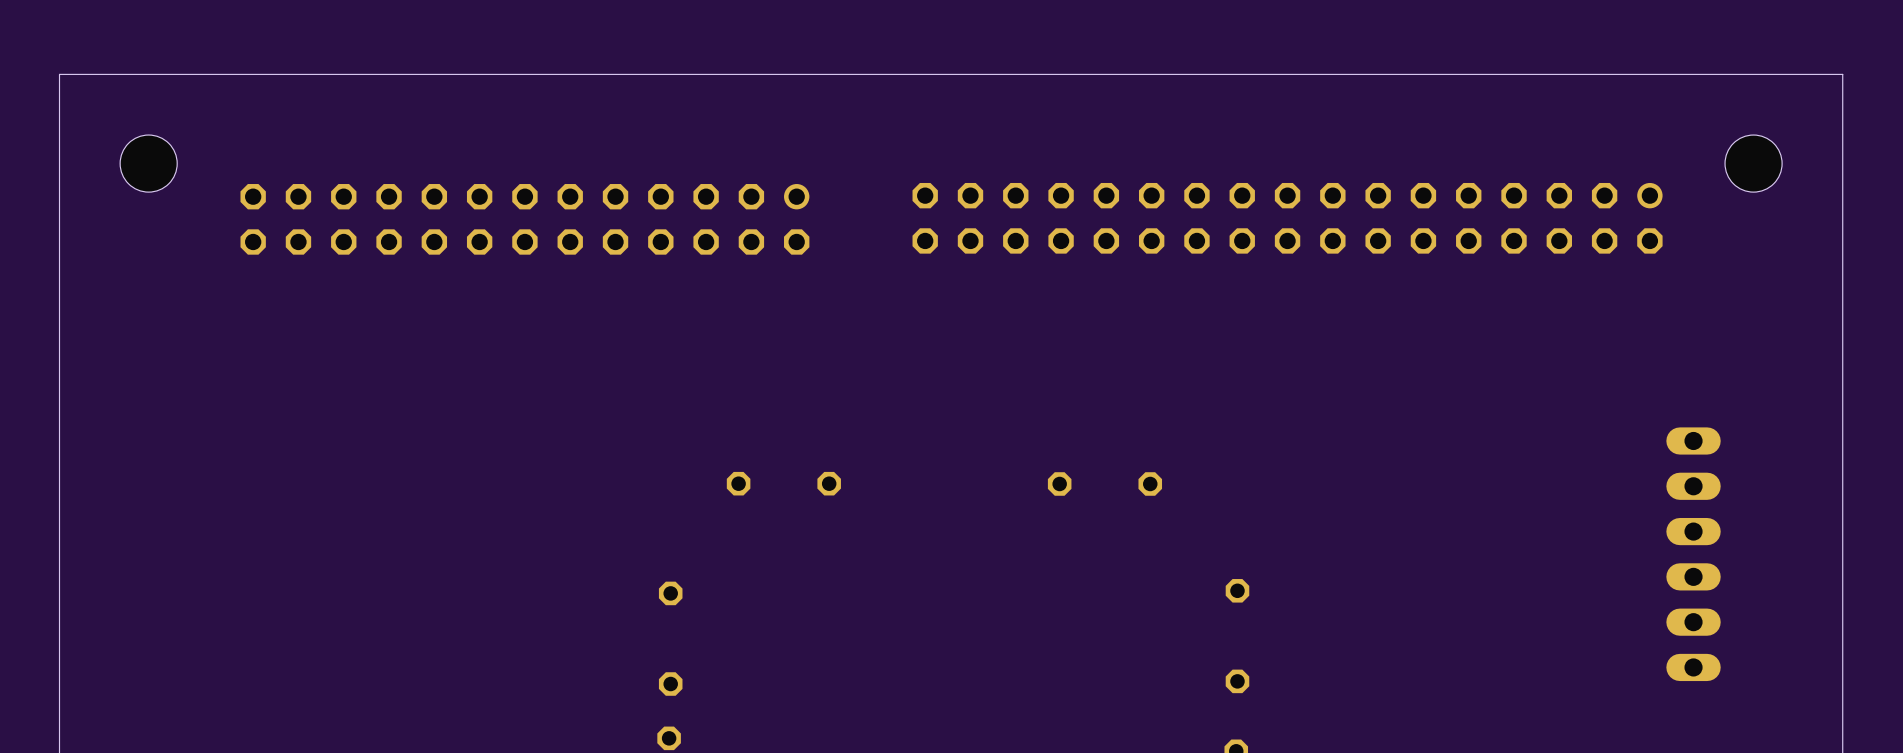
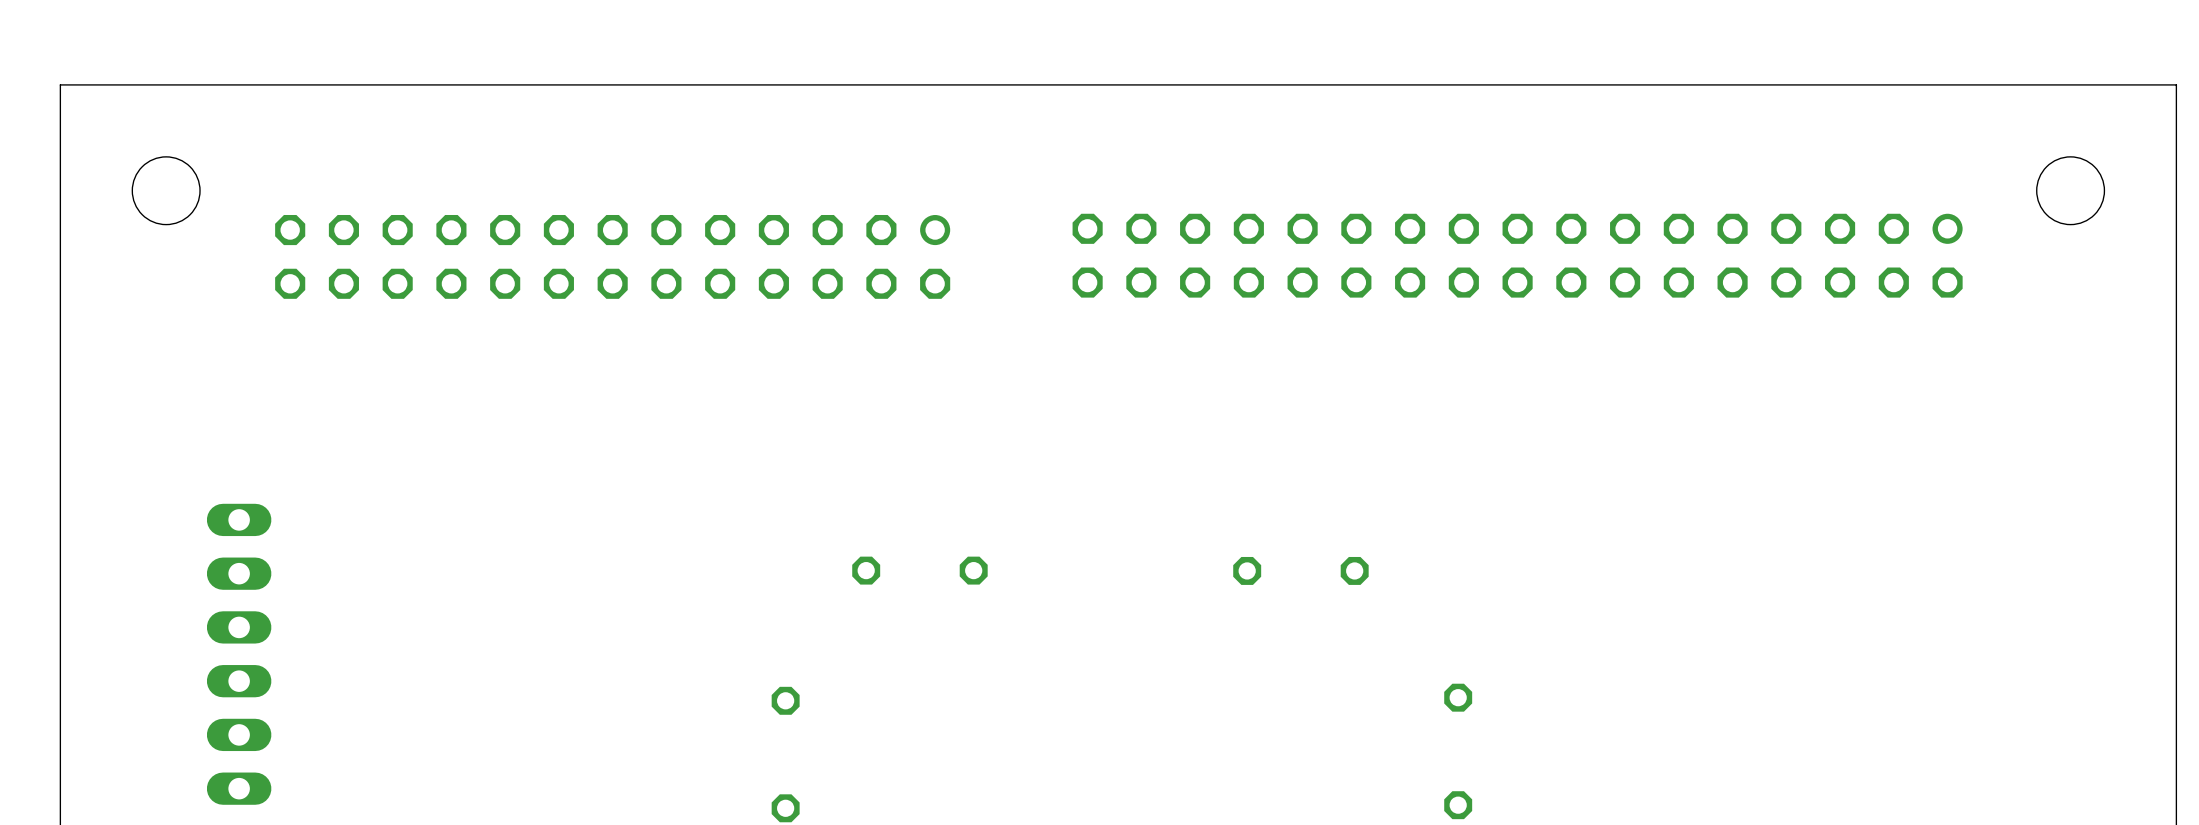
part: none -> (239, 654)
part: (1693, 554) -> none

